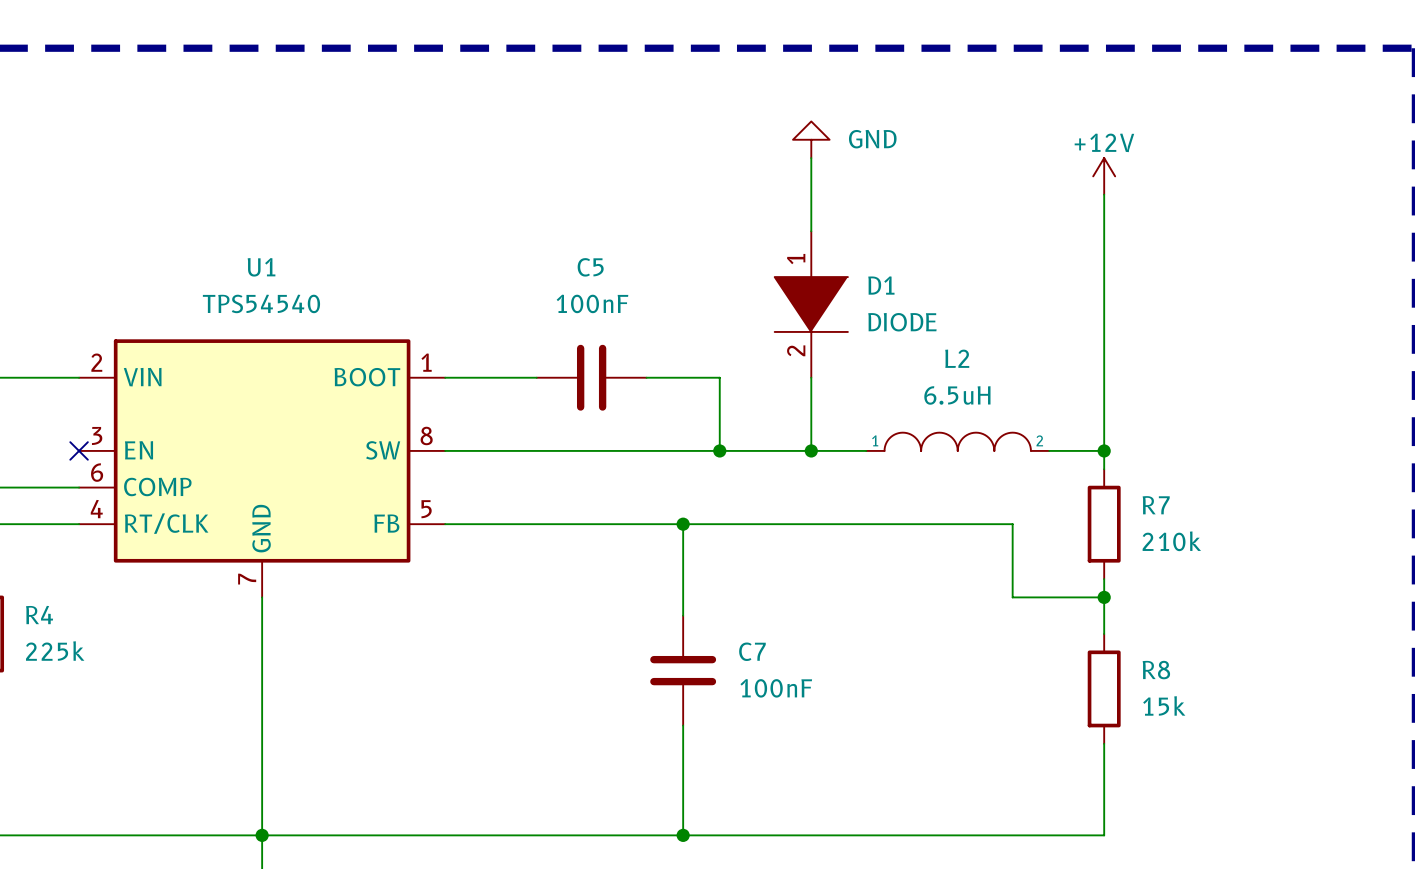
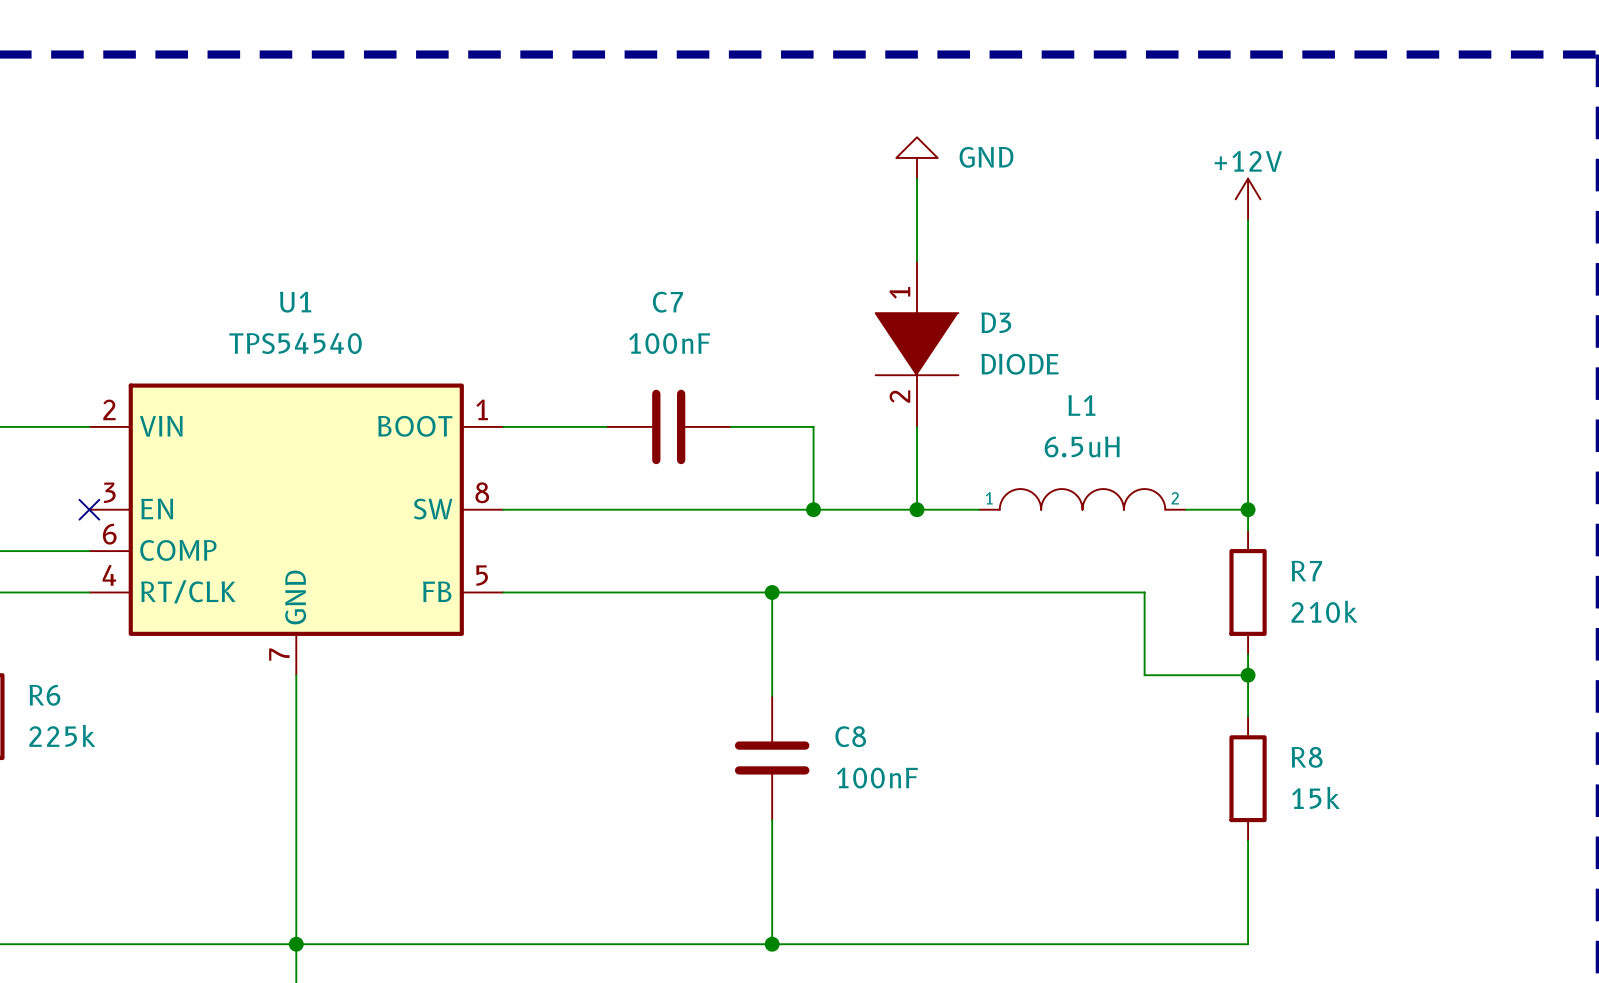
C5 name: C5 (590, 267) -> C7 (667, 302)
D1 name: D1 (881, 285) -> D3 (996, 322)
L2 name: L2 (957, 358) -> L1 (1081, 405)
R4 name: R4 (39, 615) -> R6 (44, 695)
C7 name: C7 (752, 651) -> C8 (850, 736)

